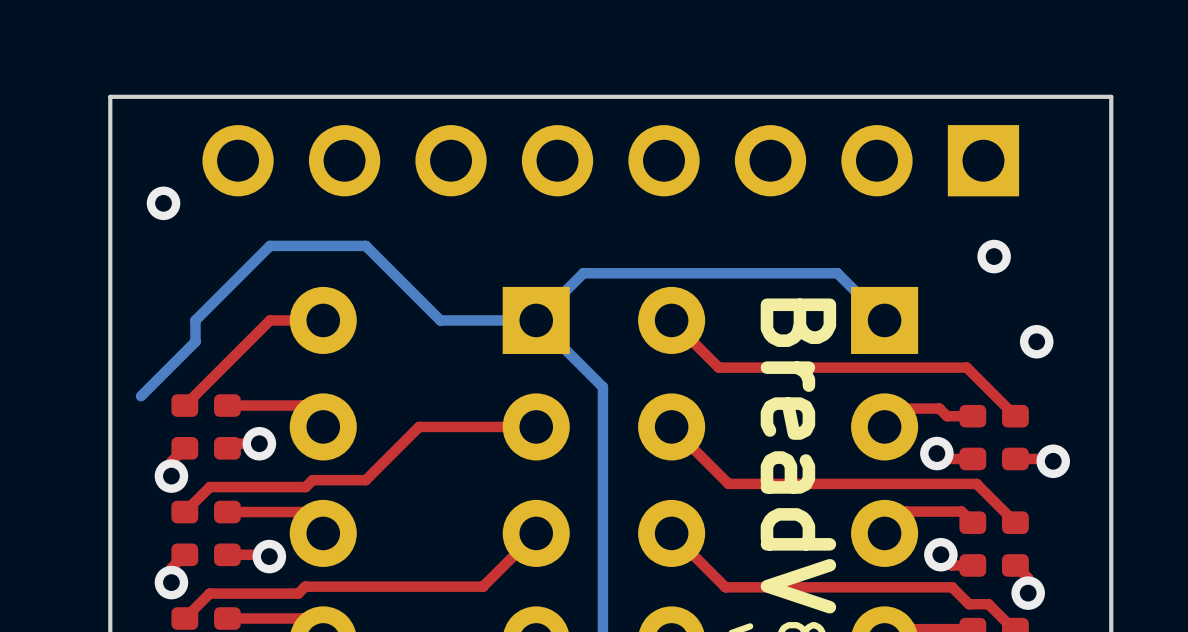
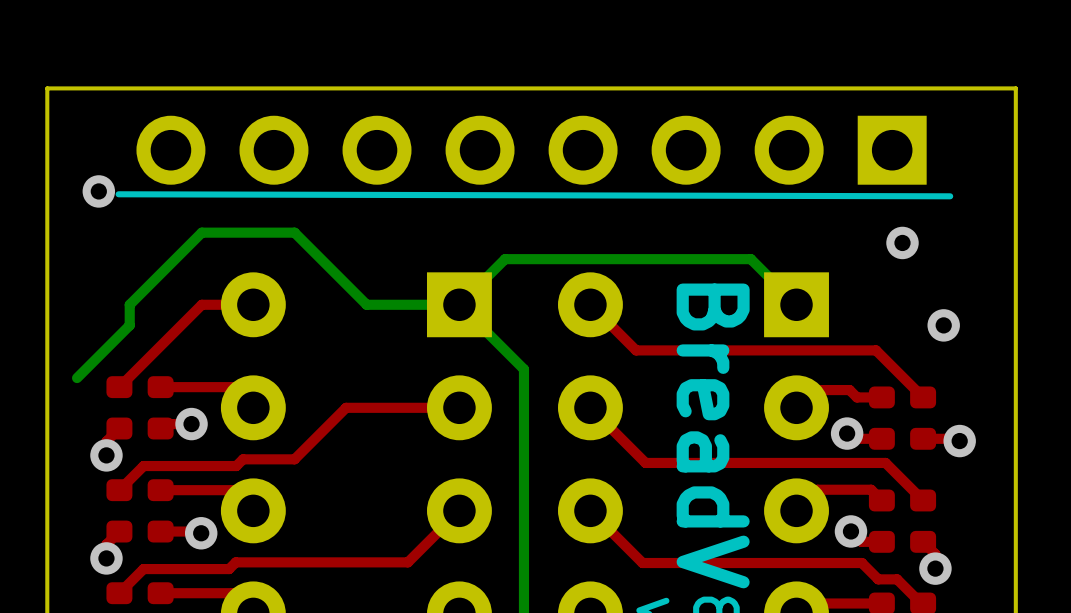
line: none -> (118, 194) (950, 196)

